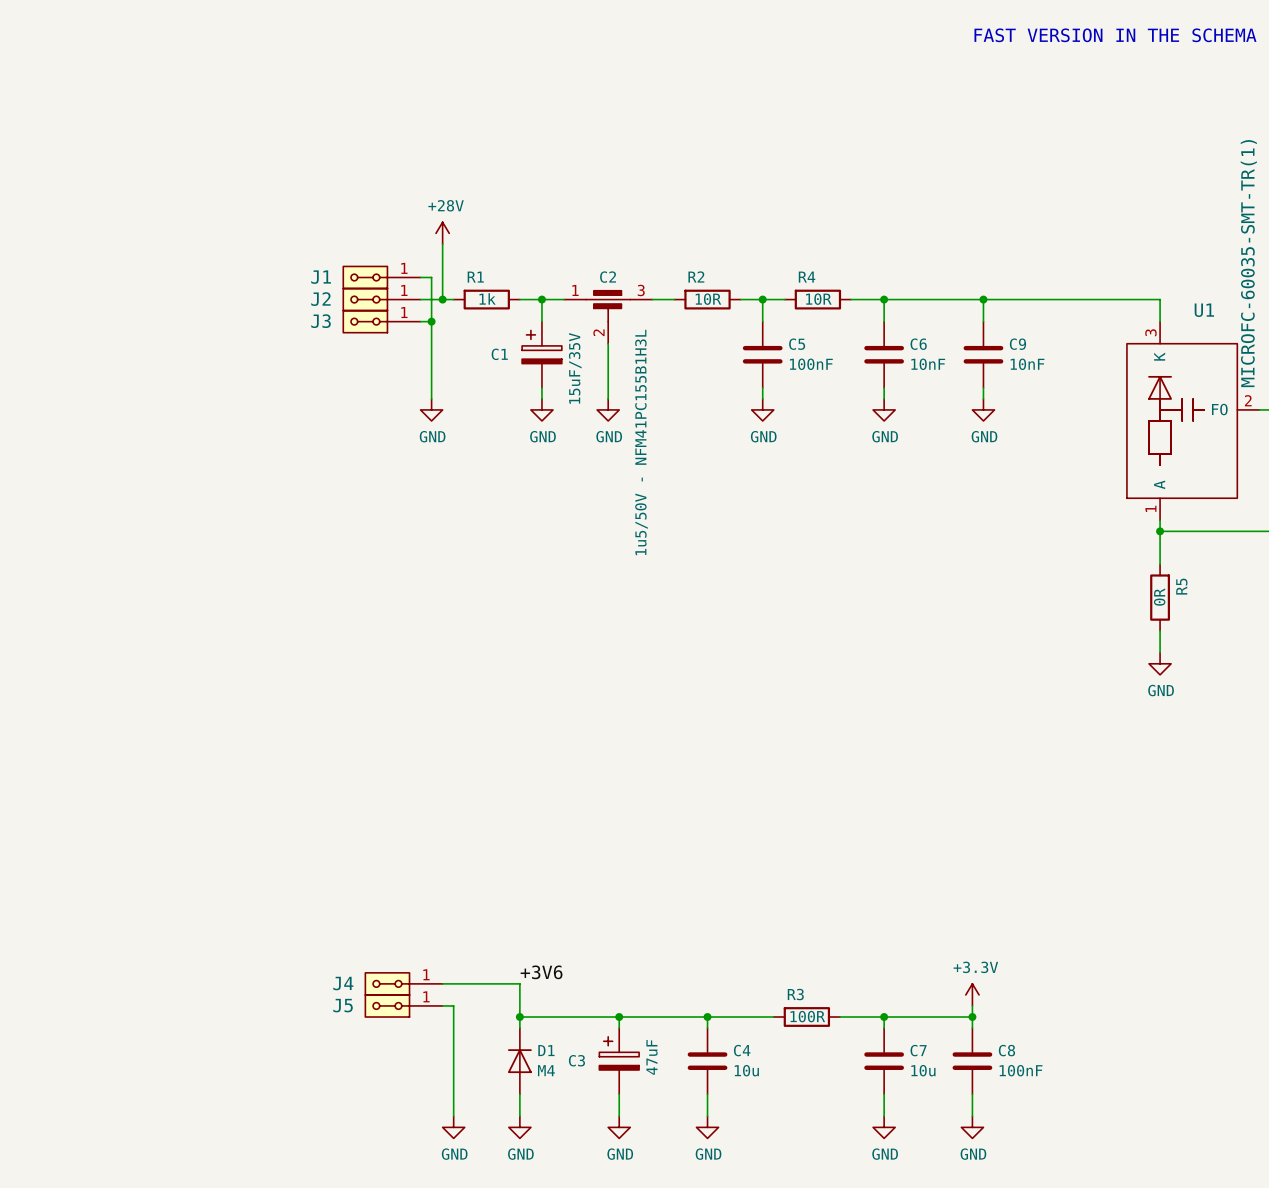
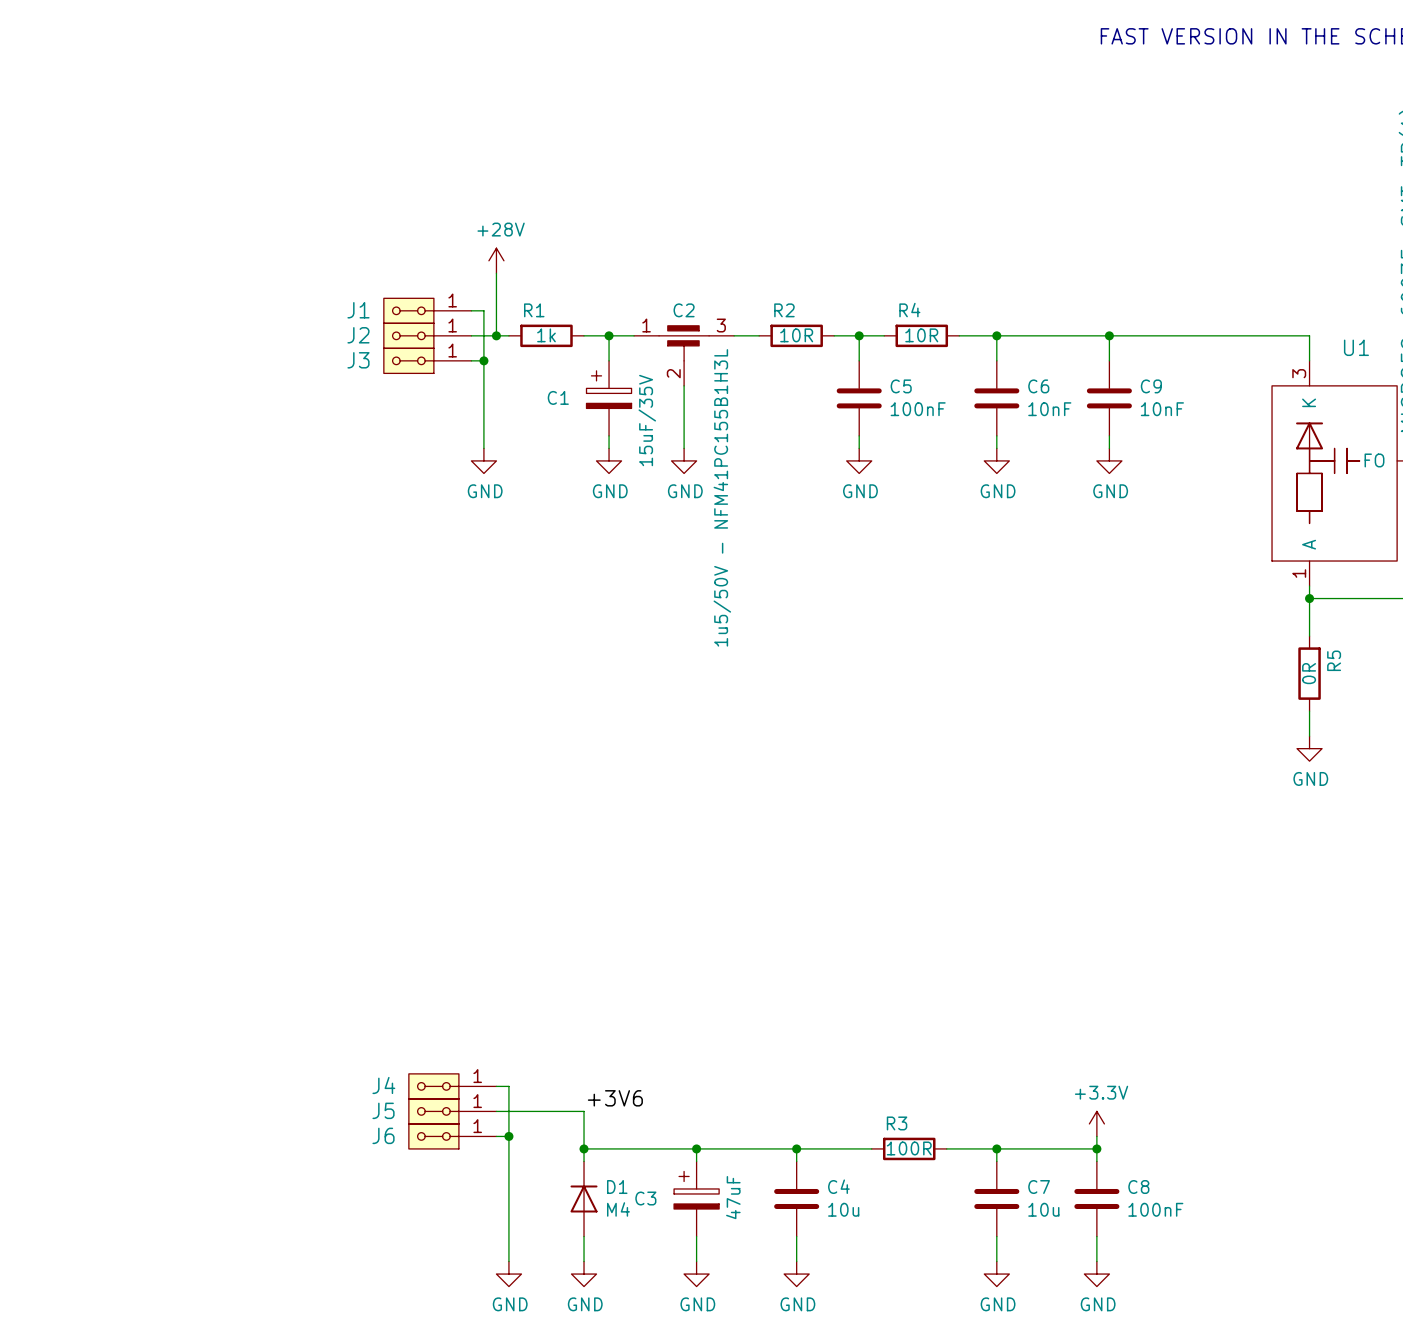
J4: none -> (452, 1086)
wire: none -> (496, 1086) (508, 1086) (508, 1136)
J4 name: J4 (343, 983) -> J5 (383, 1110)
J5 name: J5 (343, 1005) -> J6 (383, 1135)
junction: none -> (508, 1136)

